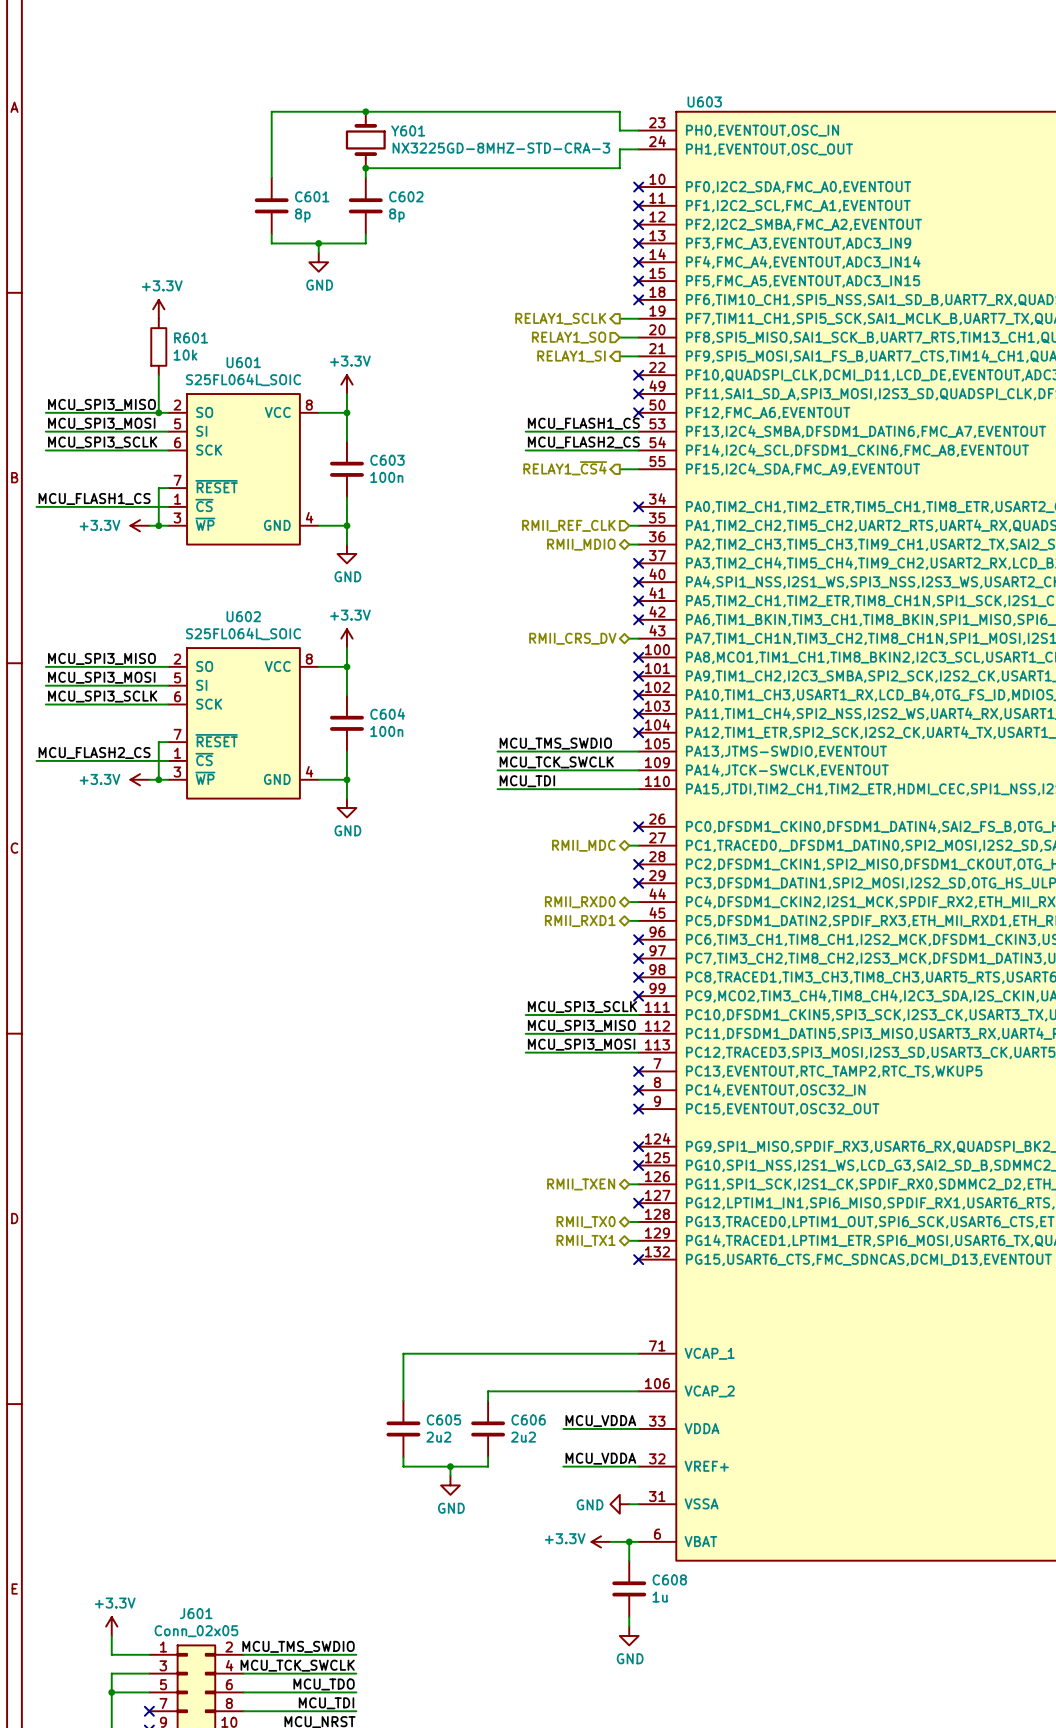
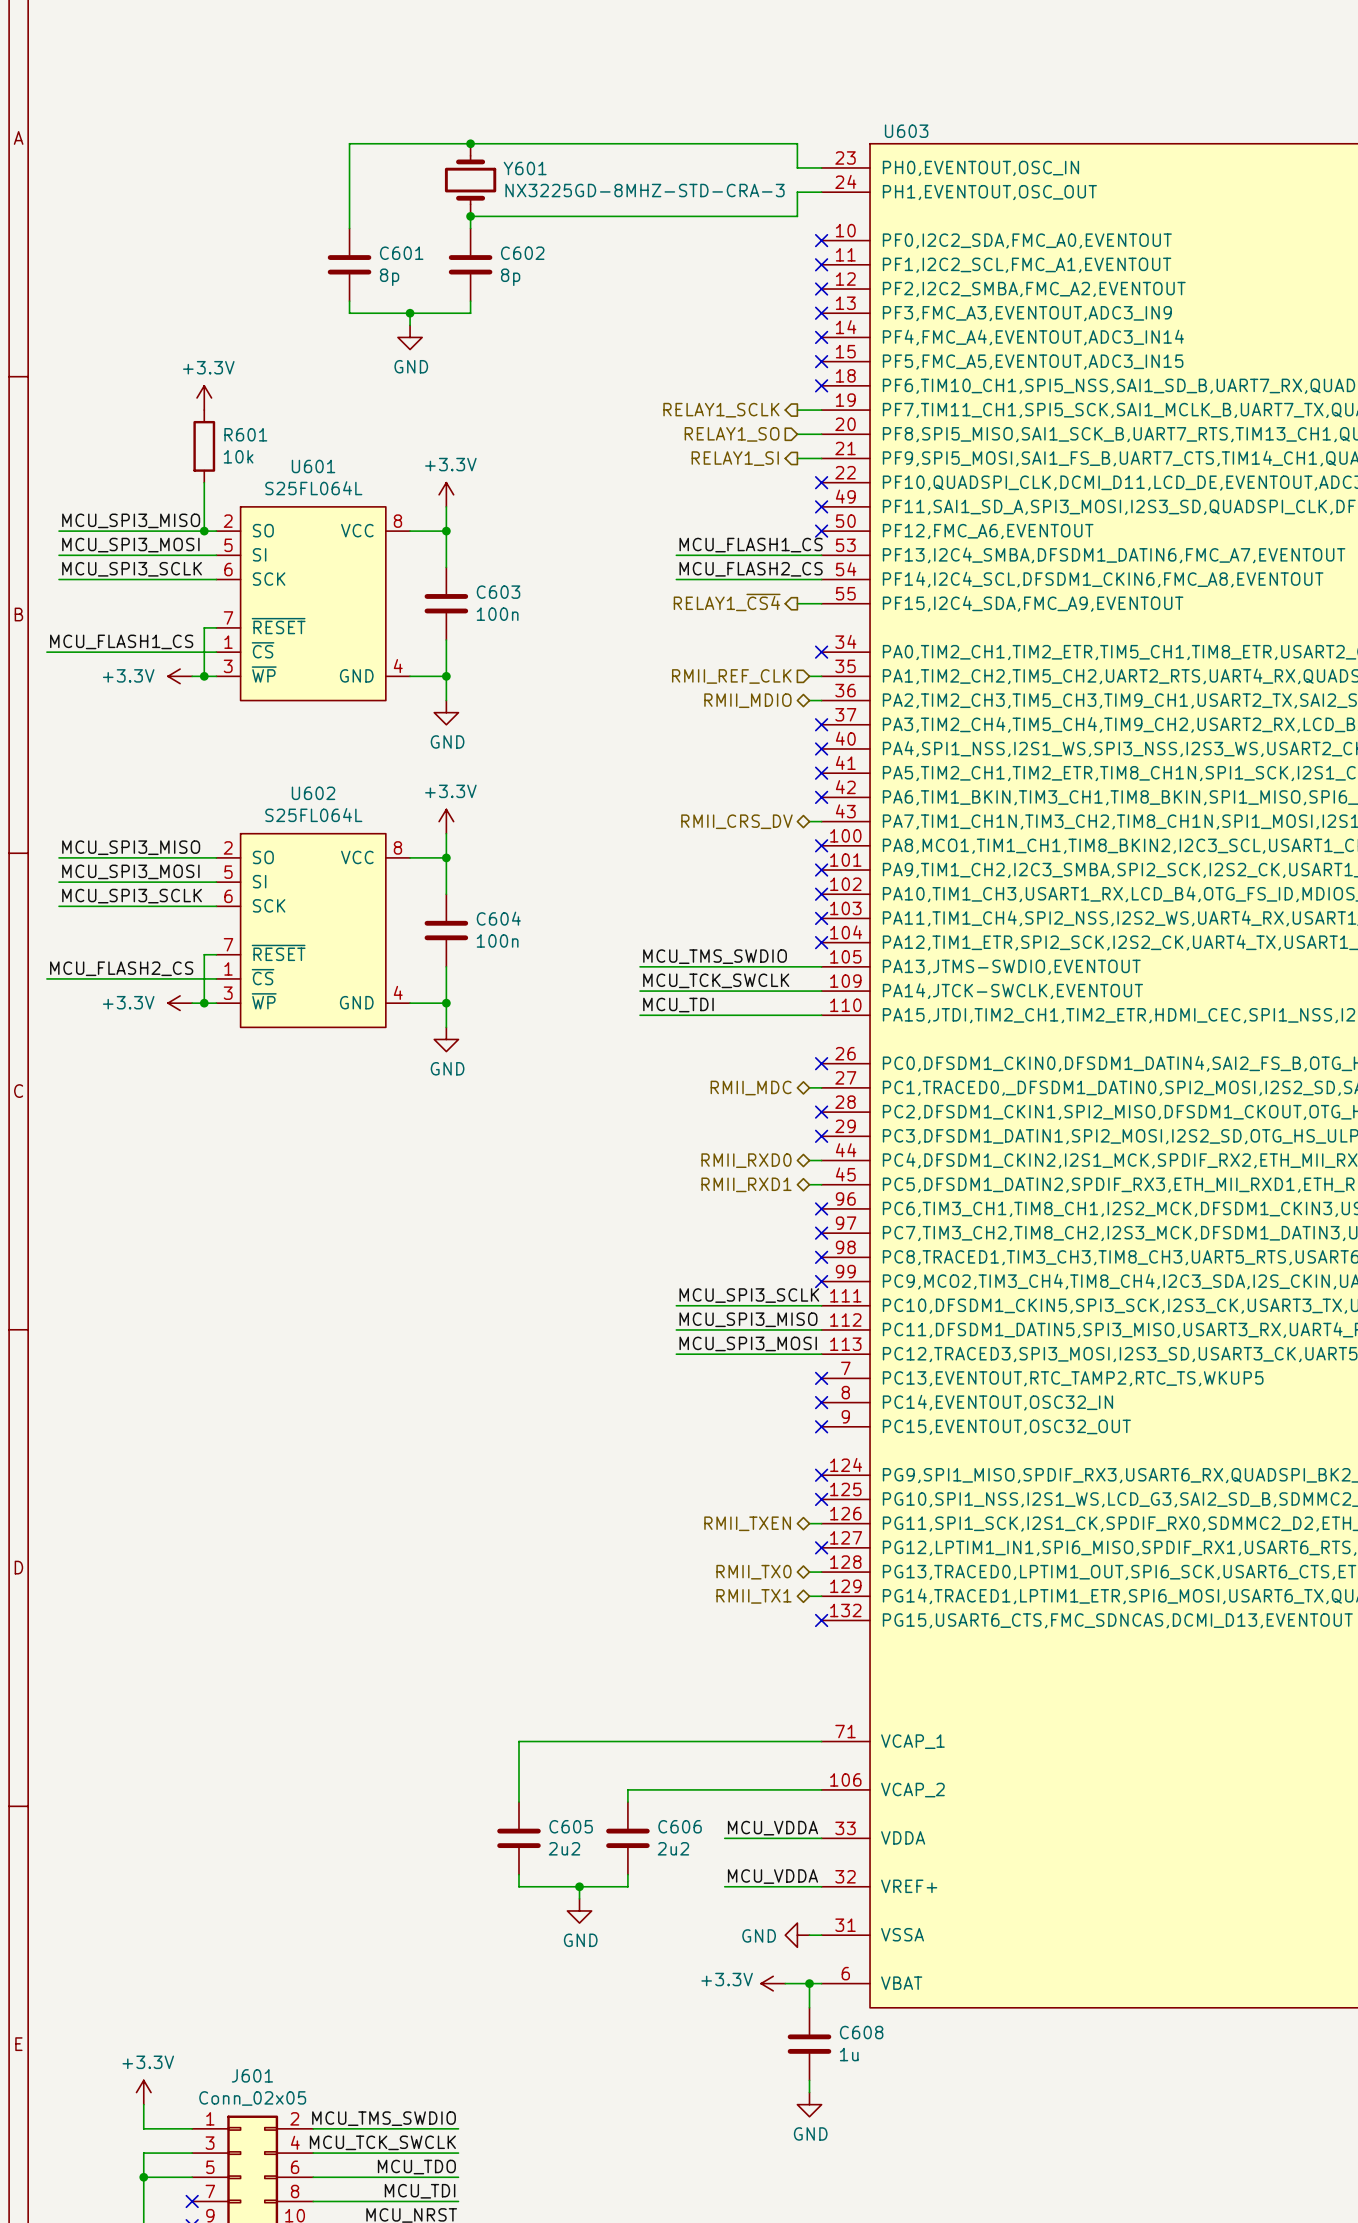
U601 value: S25FL064L_SOIC (243, 379) -> S25FL064L (313, 488)
U602 value: S25FL064L_SOIC (243, 634) -> S25FL064L (313, 815)

